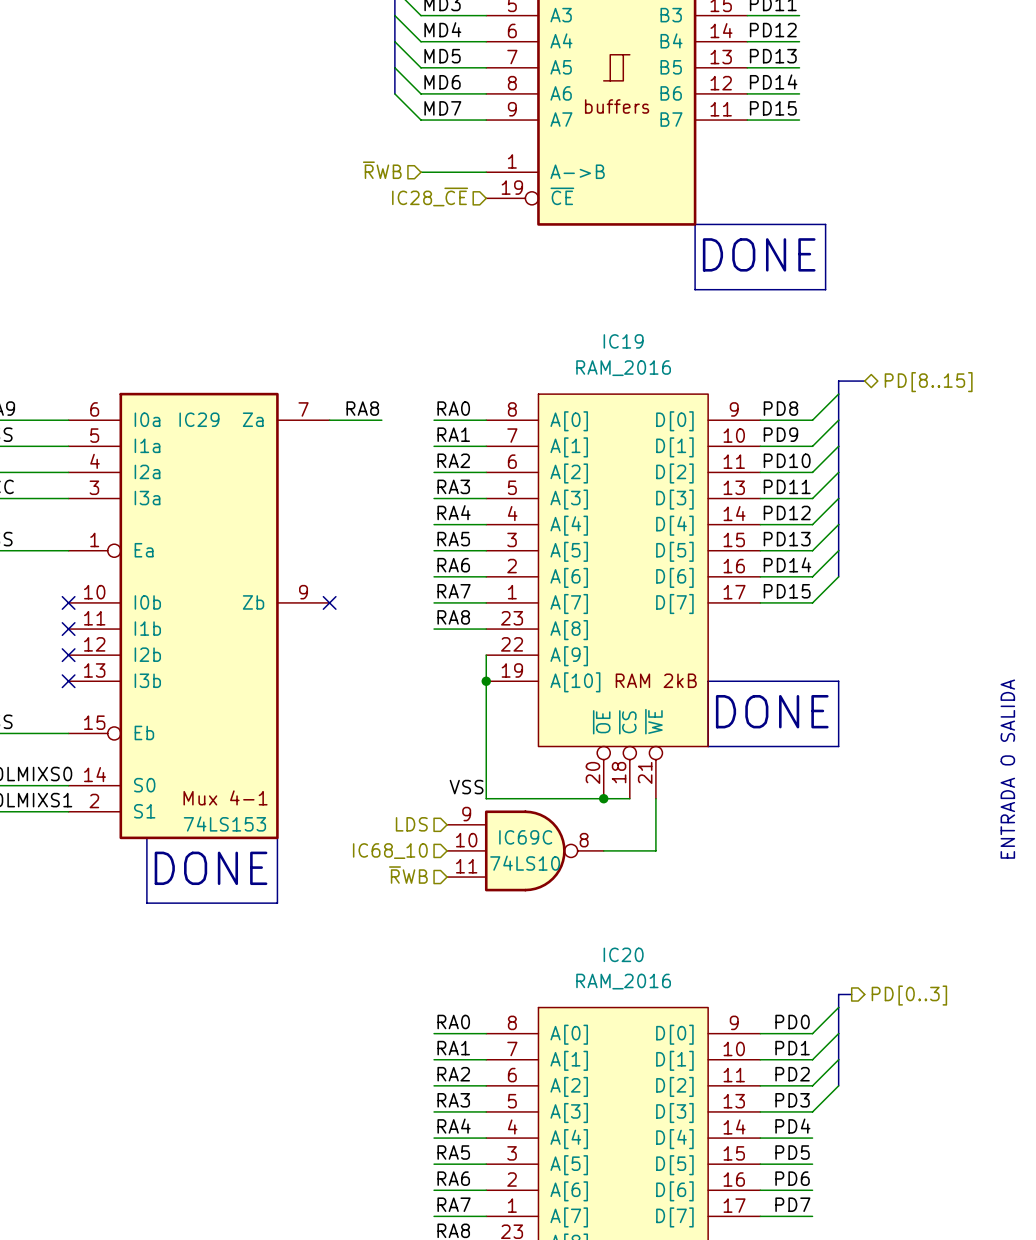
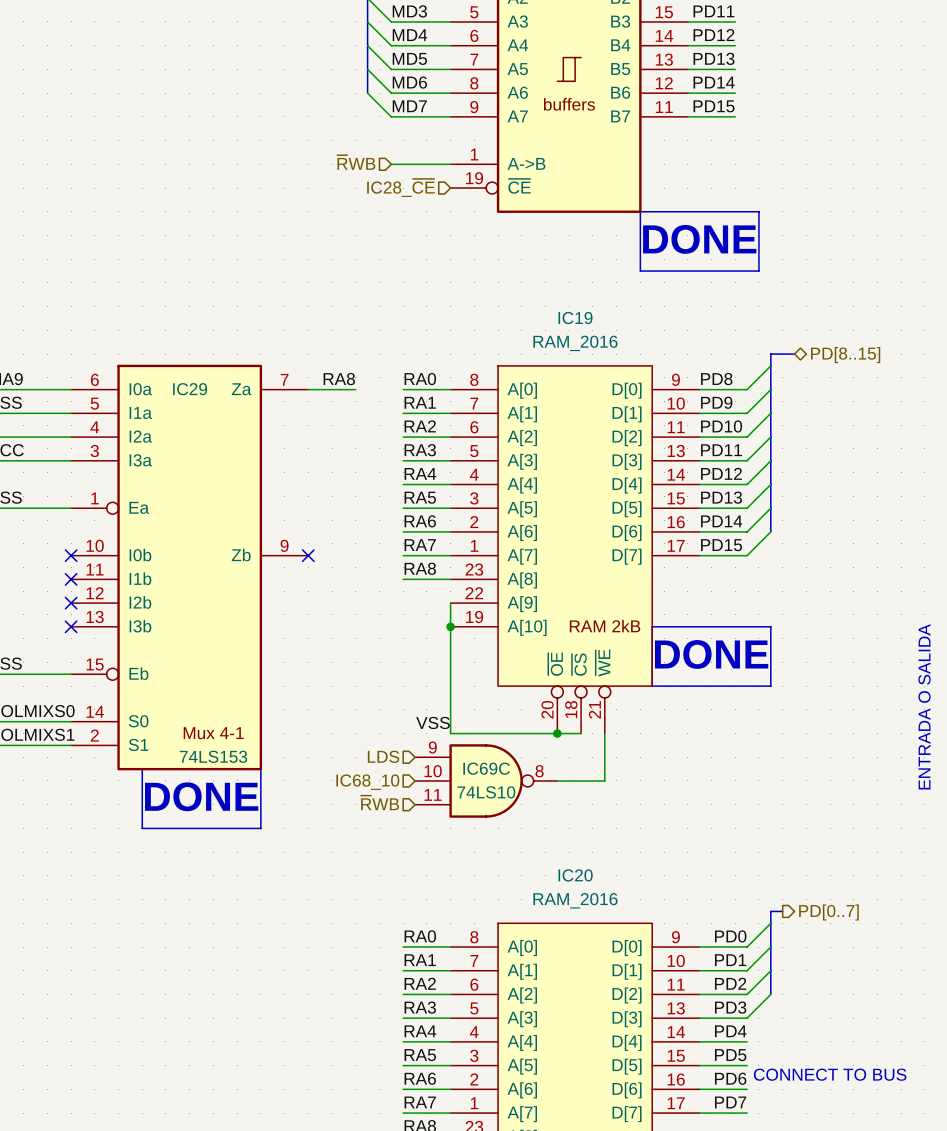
hierarchical label: PD[0..3] (909, 995) -> PD[0..7] (828, 912)
text: none -> CONNECT TO BUS (830, 1074)

